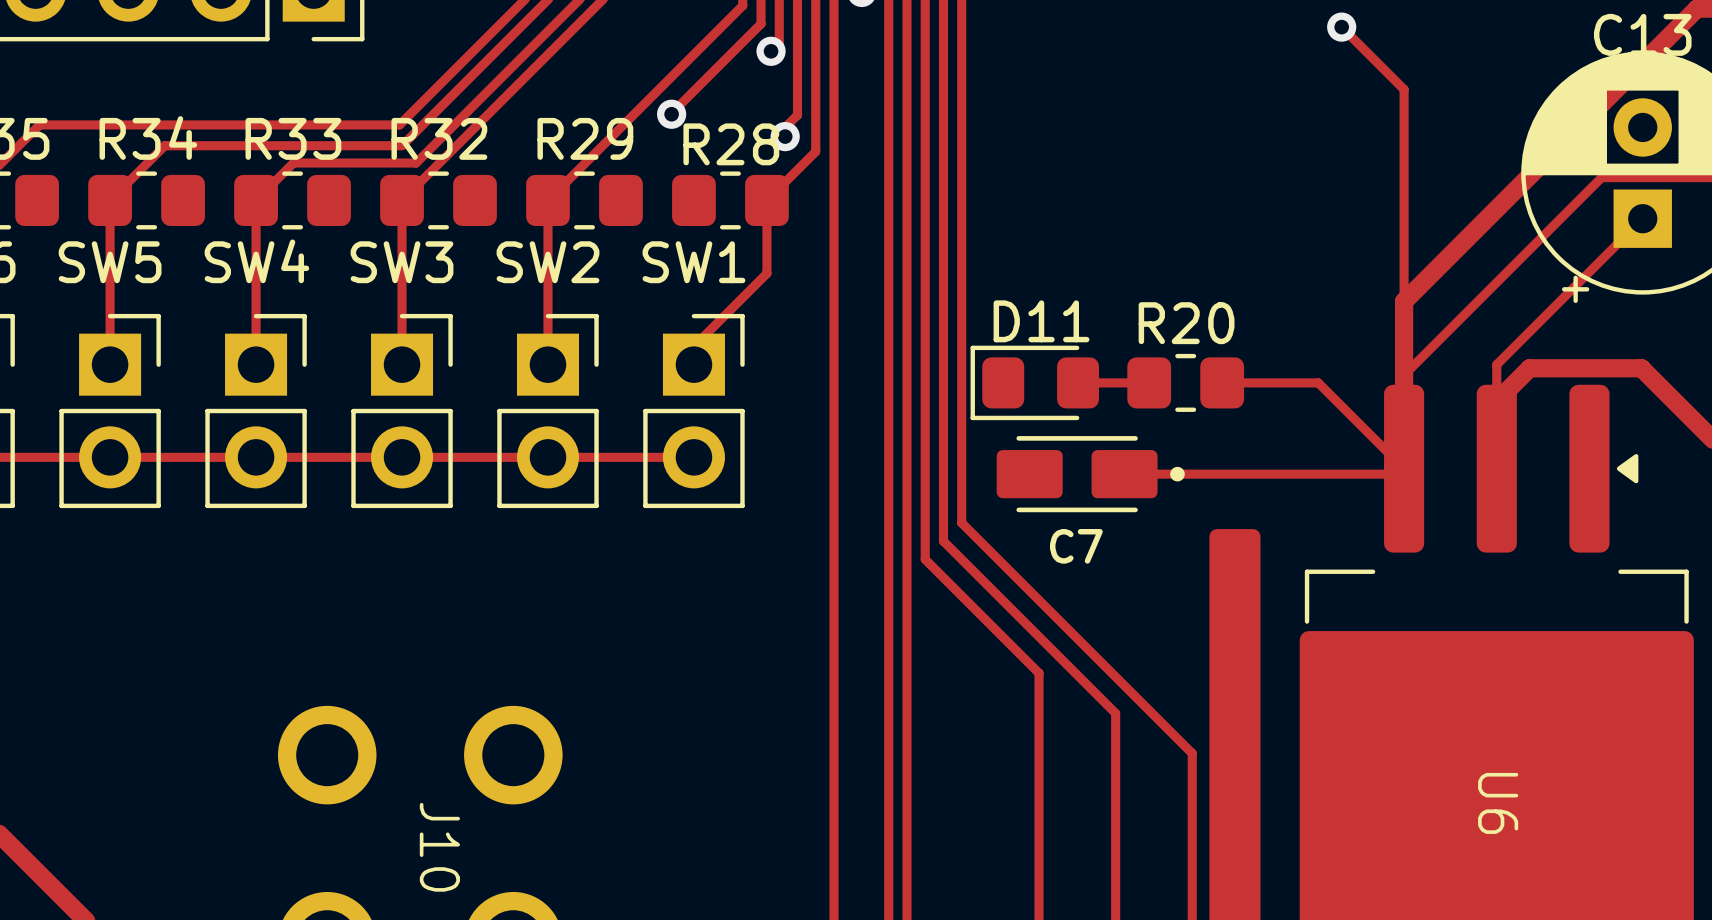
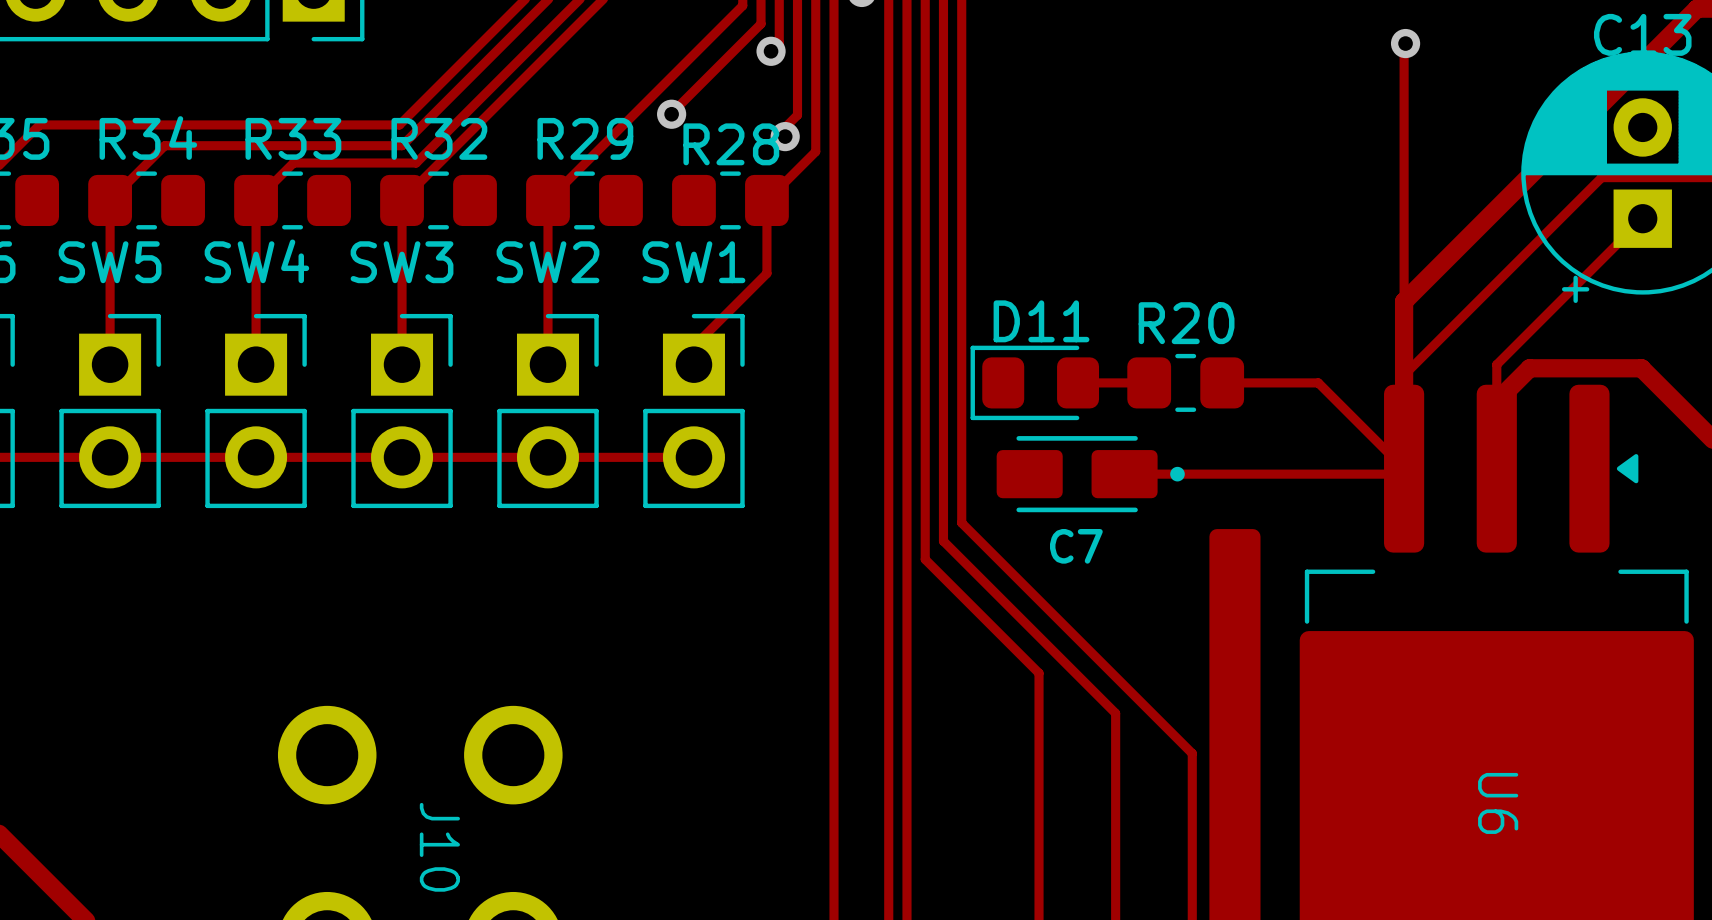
track: (1341, 27) (1404, 89) -> (1405, 43) (1404, 89)
via position: (1341, 27) -> (1405, 43)

